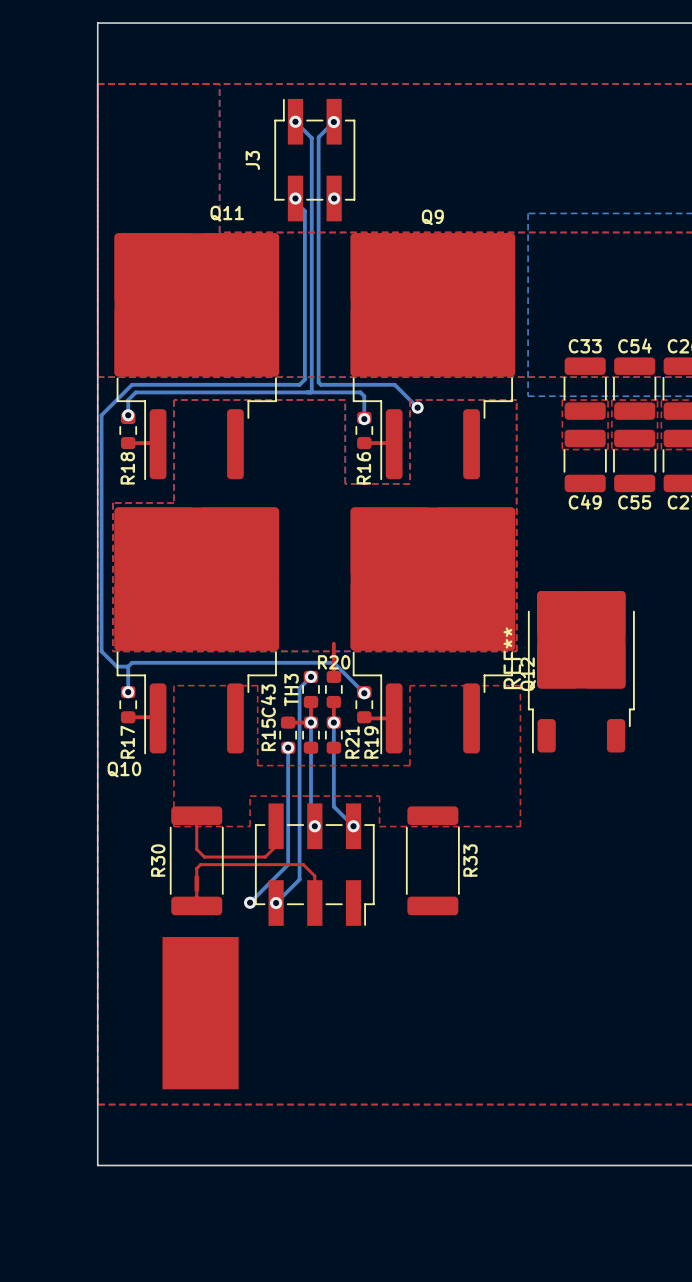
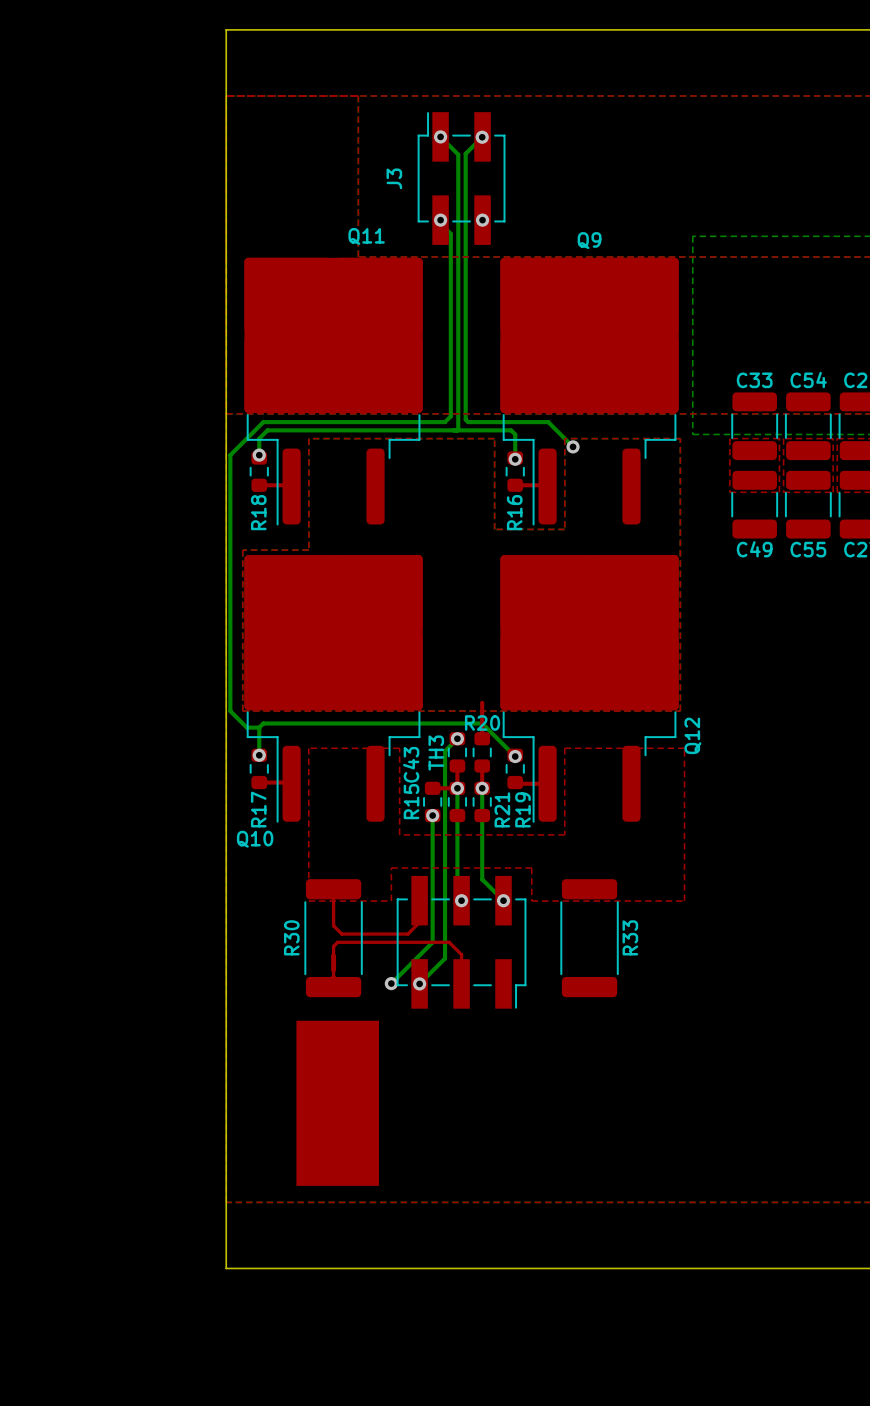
REF**: (581, 672) -> none

